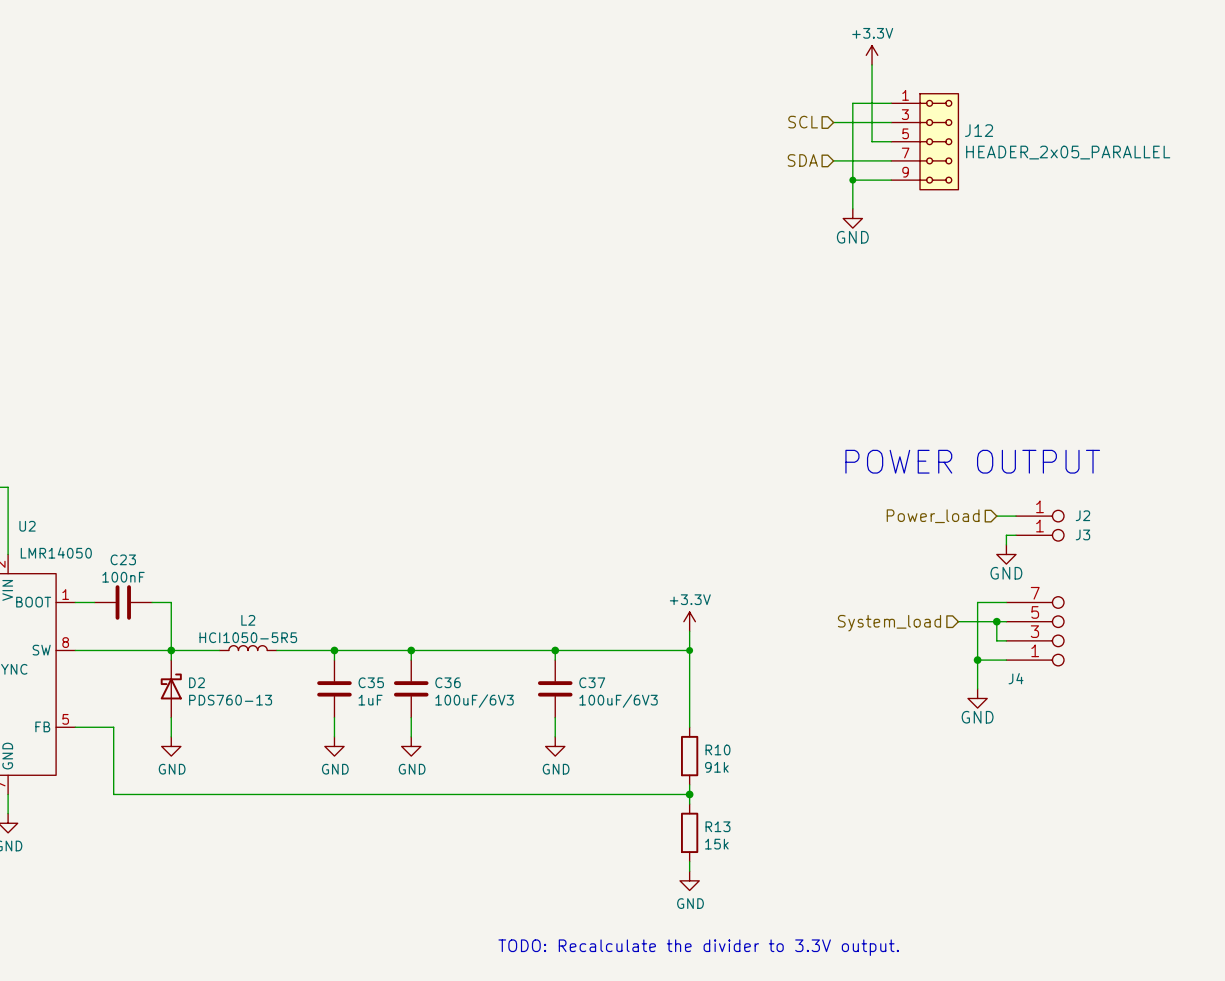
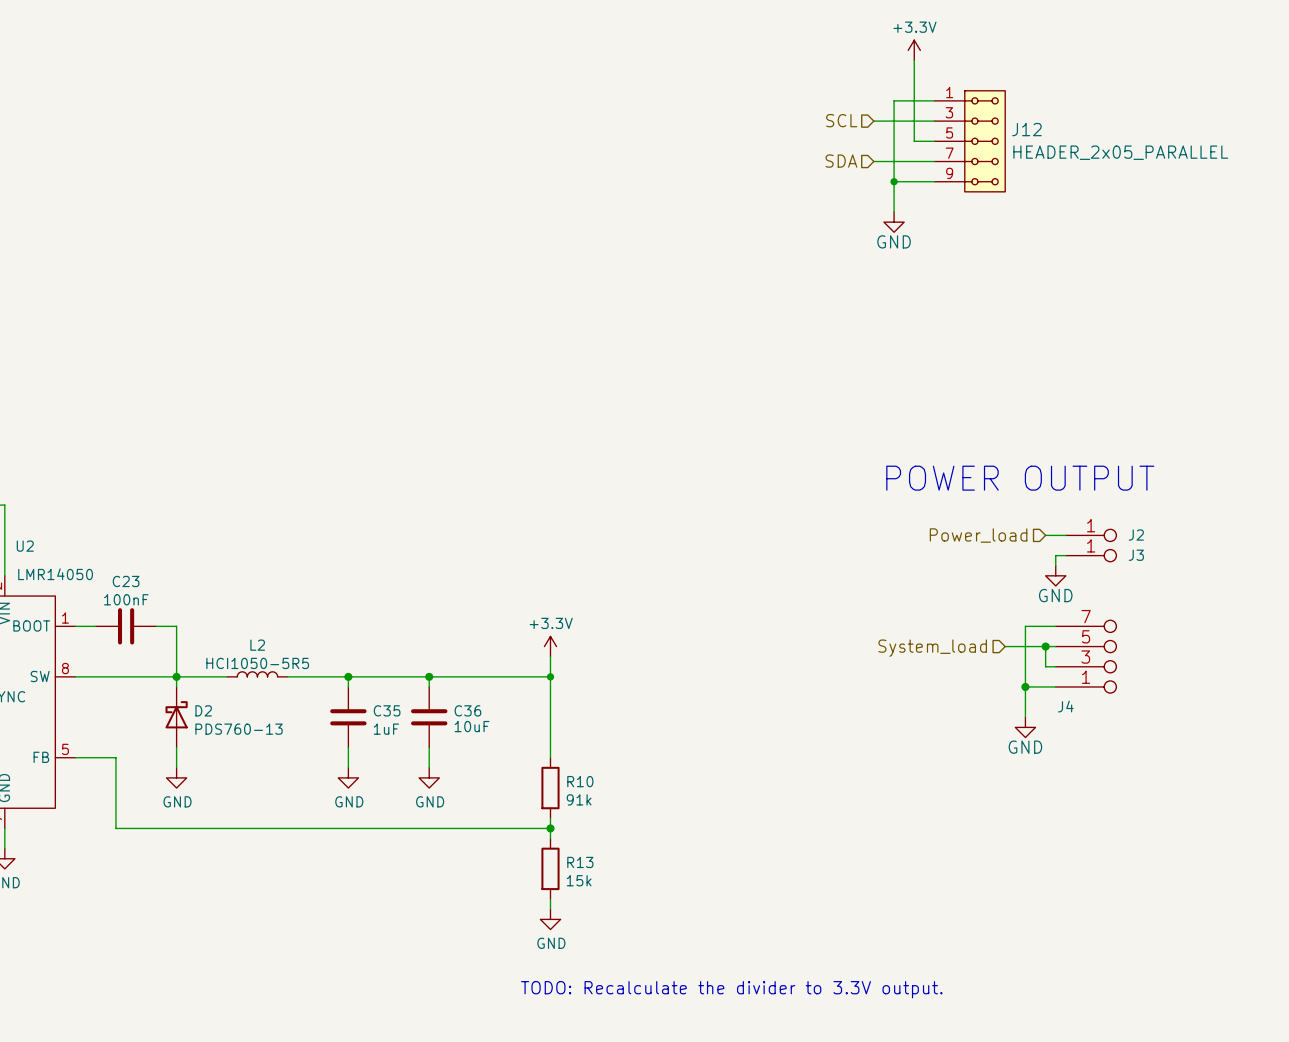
power symbol position: +3.3V (689, 621) -> +3.3V (550, 646)
wire: (689, 631) (689, 727) -> (550, 656) (550, 757)
wire: (526, 650) (689, 650) -> none
junction: none -> (550, 676)
wire: (555, 650) (555, 660) -> none
junction: (555, 650) -> none
junction: (689, 650) -> none
C37: 100uF/6V3 (555, 688) -> none
C36 value: 100uF/6V3 (474, 701) -> 10uF (472, 726)
wire: (555, 717) (555, 736) -> none
power symbol: GND (555, 746) -> none
R10 position: (689, 756) -> (550, 788)
wire: (689, 784) (689, 804) -> (550, 818) (550, 838)
wire: (526, 794) (689, 794) -> none
junction: none -> (550, 828)
junction: (689, 794) -> none
R13 position: (689, 832) -> (550, 868)
wire: (689, 861) (689, 871) -> (550, 899) (550, 909)
power symbol: none -> GND (550, 919)
power symbol: GND (689, 880) -> none

